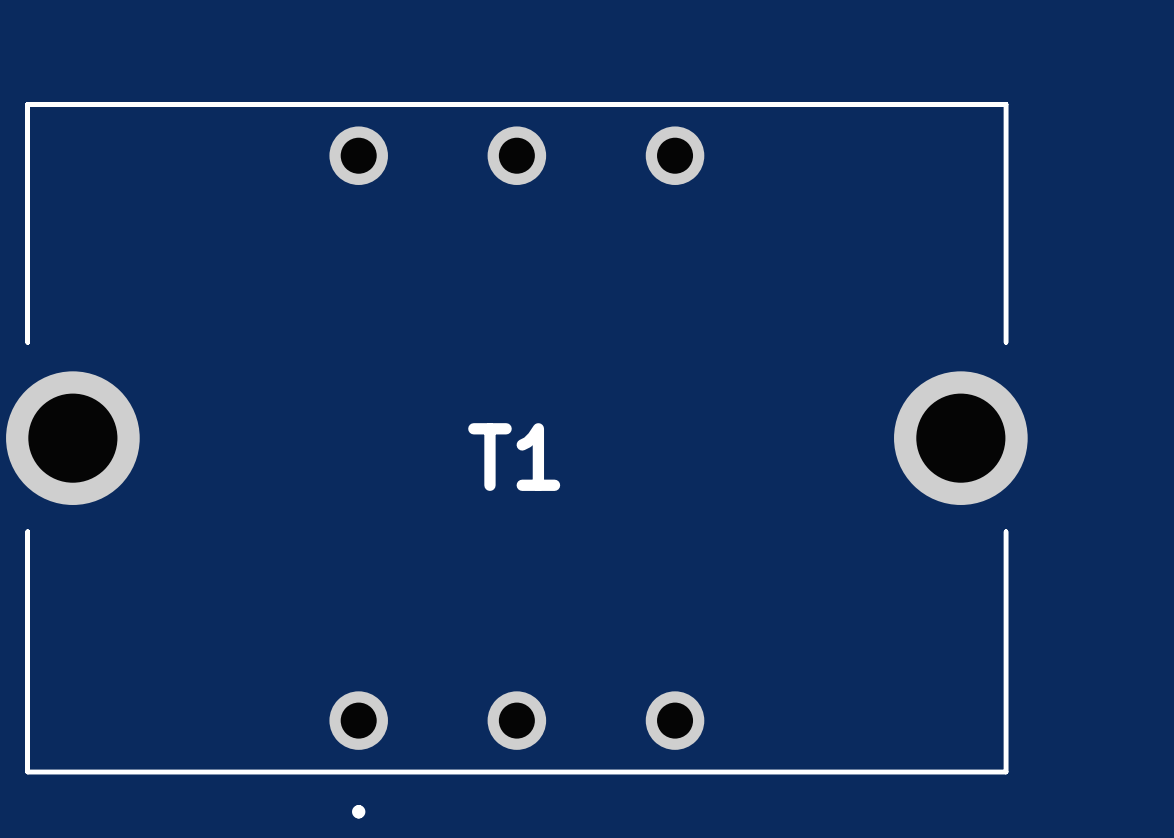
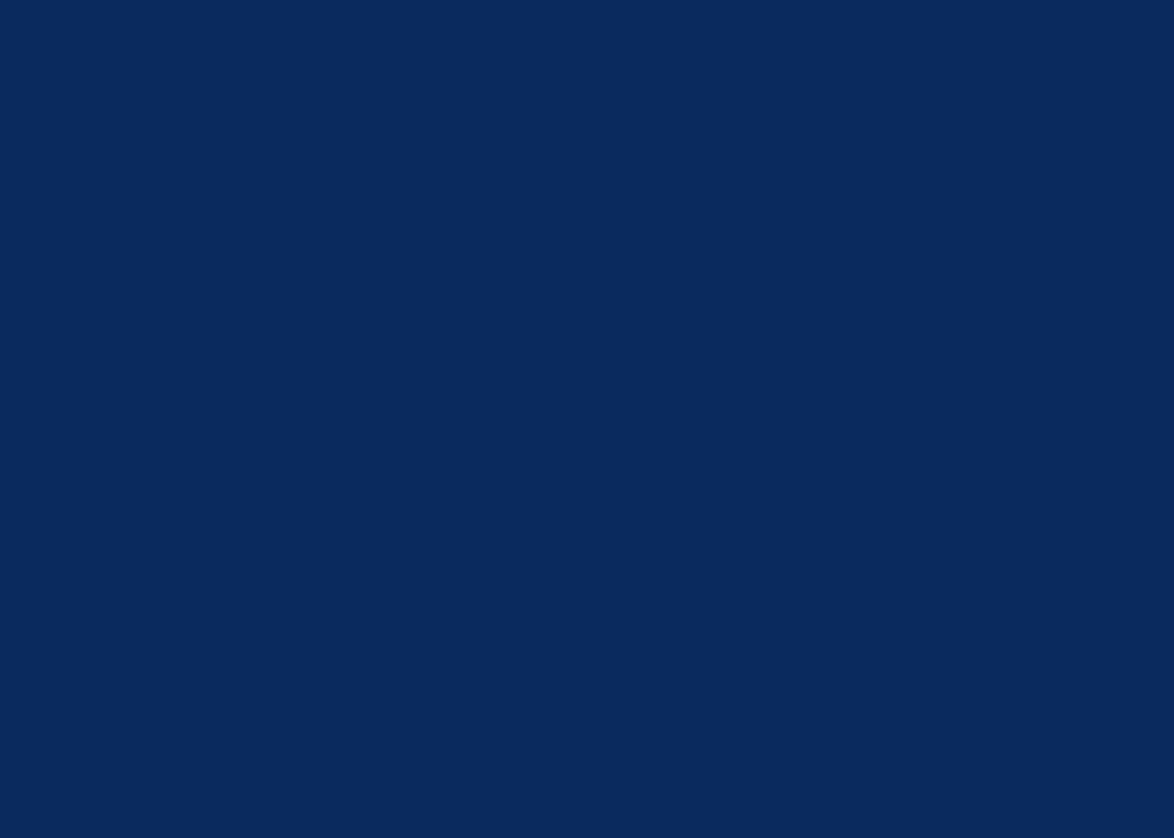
T1: (516, 460) -> none

